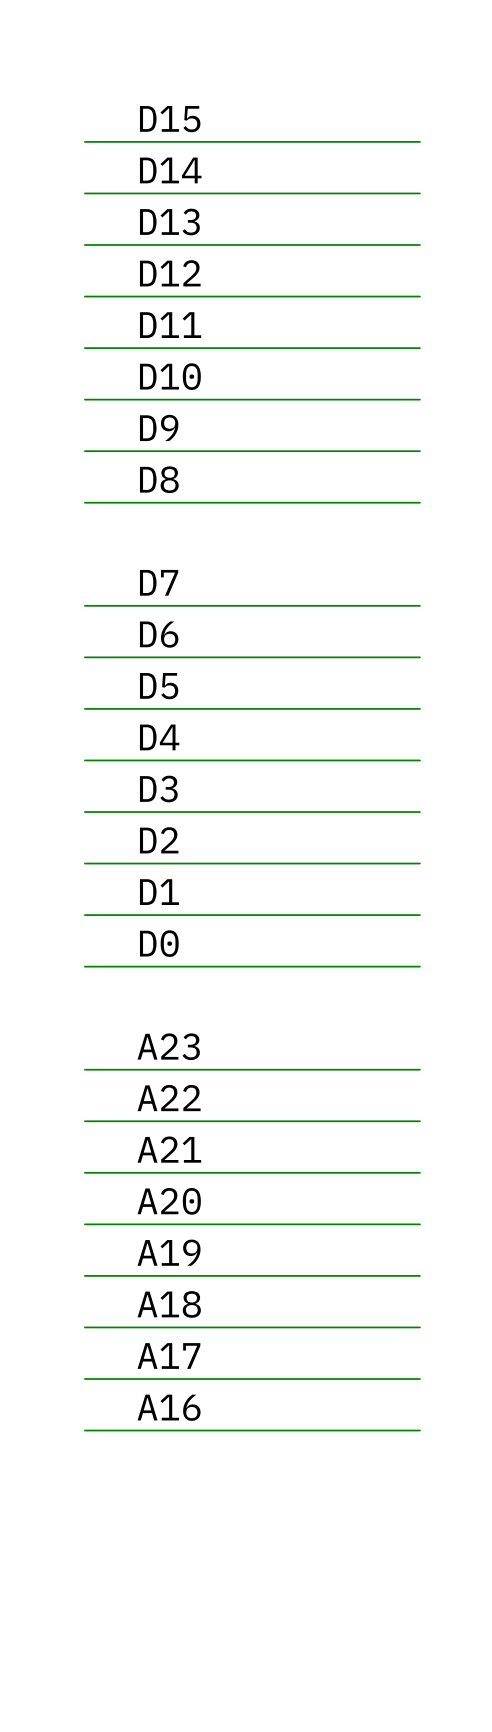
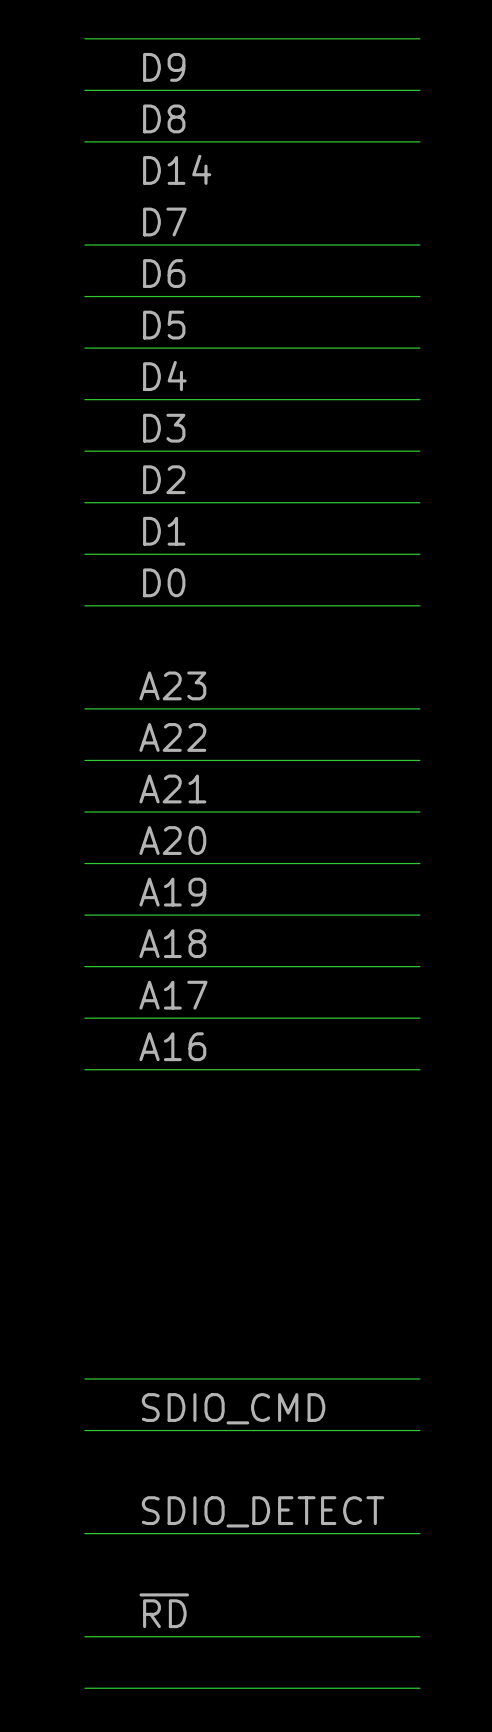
wire: none -> (84, 38) (419, 38)
label: none -> D9 (164, 67)
wire: none -> (84, 90) (419, 90)
label: D15 (170, 119) -> D8 (164, 118)
wire: (84, 193) (419, 193) -> (84, 554) (419, 554)
label: D13 (169, 222) -> D7 (164, 222)
label: D12 (170, 273) -> D6 (164, 273)
label: D11 (170, 325) -> D5 (164, 325)
label: D10 (170, 376) -> D4 (164, 376)
label: D9 (159, 427) -> D3 (164, 428)
label: D8 (159, 479) -> D2 (164, 479)
label: none -> D1 (164, 531)
label: D7 (159, 582) -> D0 (164, 582)
label: D6 (159, 634) -> none
wire: (84, 657) (419, 657) -> (84, 1018) (419, 1018)
label: D5 (159, 686) -> A23 (172, 685)
label: D4 (159, 737) -> A22 (172, 737)
label: D3 (158, 788) -> A21 (172, 788)
label: D2 (159, 840) -> A20 (172, 840)
label: D1 (159, 892) -> A19 (172, 892)
label: D0 (159, 943) -> A18 (172, 943)
label: A23 (168, 1046) -> A16 (172, 1046)
label: A22 (169, 1098) -> none
wire: (84, 1121) (419, 1121) -> none
label: A21 (169, 1149) -> none
wire: (84, 1172) (419, 1172) -> (84, 1533) (419, 1533)
label: A20 (169, 1201) -> none
wire: (84, 1224) (419, 1224) -> none
label: A19 (169, 1252) -> none
wire: (84, 1275) (419, 1275) -> (84, 1636) (419, 1636)
label: A18 (169, 1304) -> none
wire: (84, 1327) (419, 1327) -> (84, 1688) (419, 1688)
label position: A17 (168, 1355) -> A17 (173, 995)
label: A16 (169, 1407) -> SDIO_CMD (233, 1408)
label: none -> SDIO_DETECT (263, 1511)
label: none -> ~{RD} (164, 1610)

